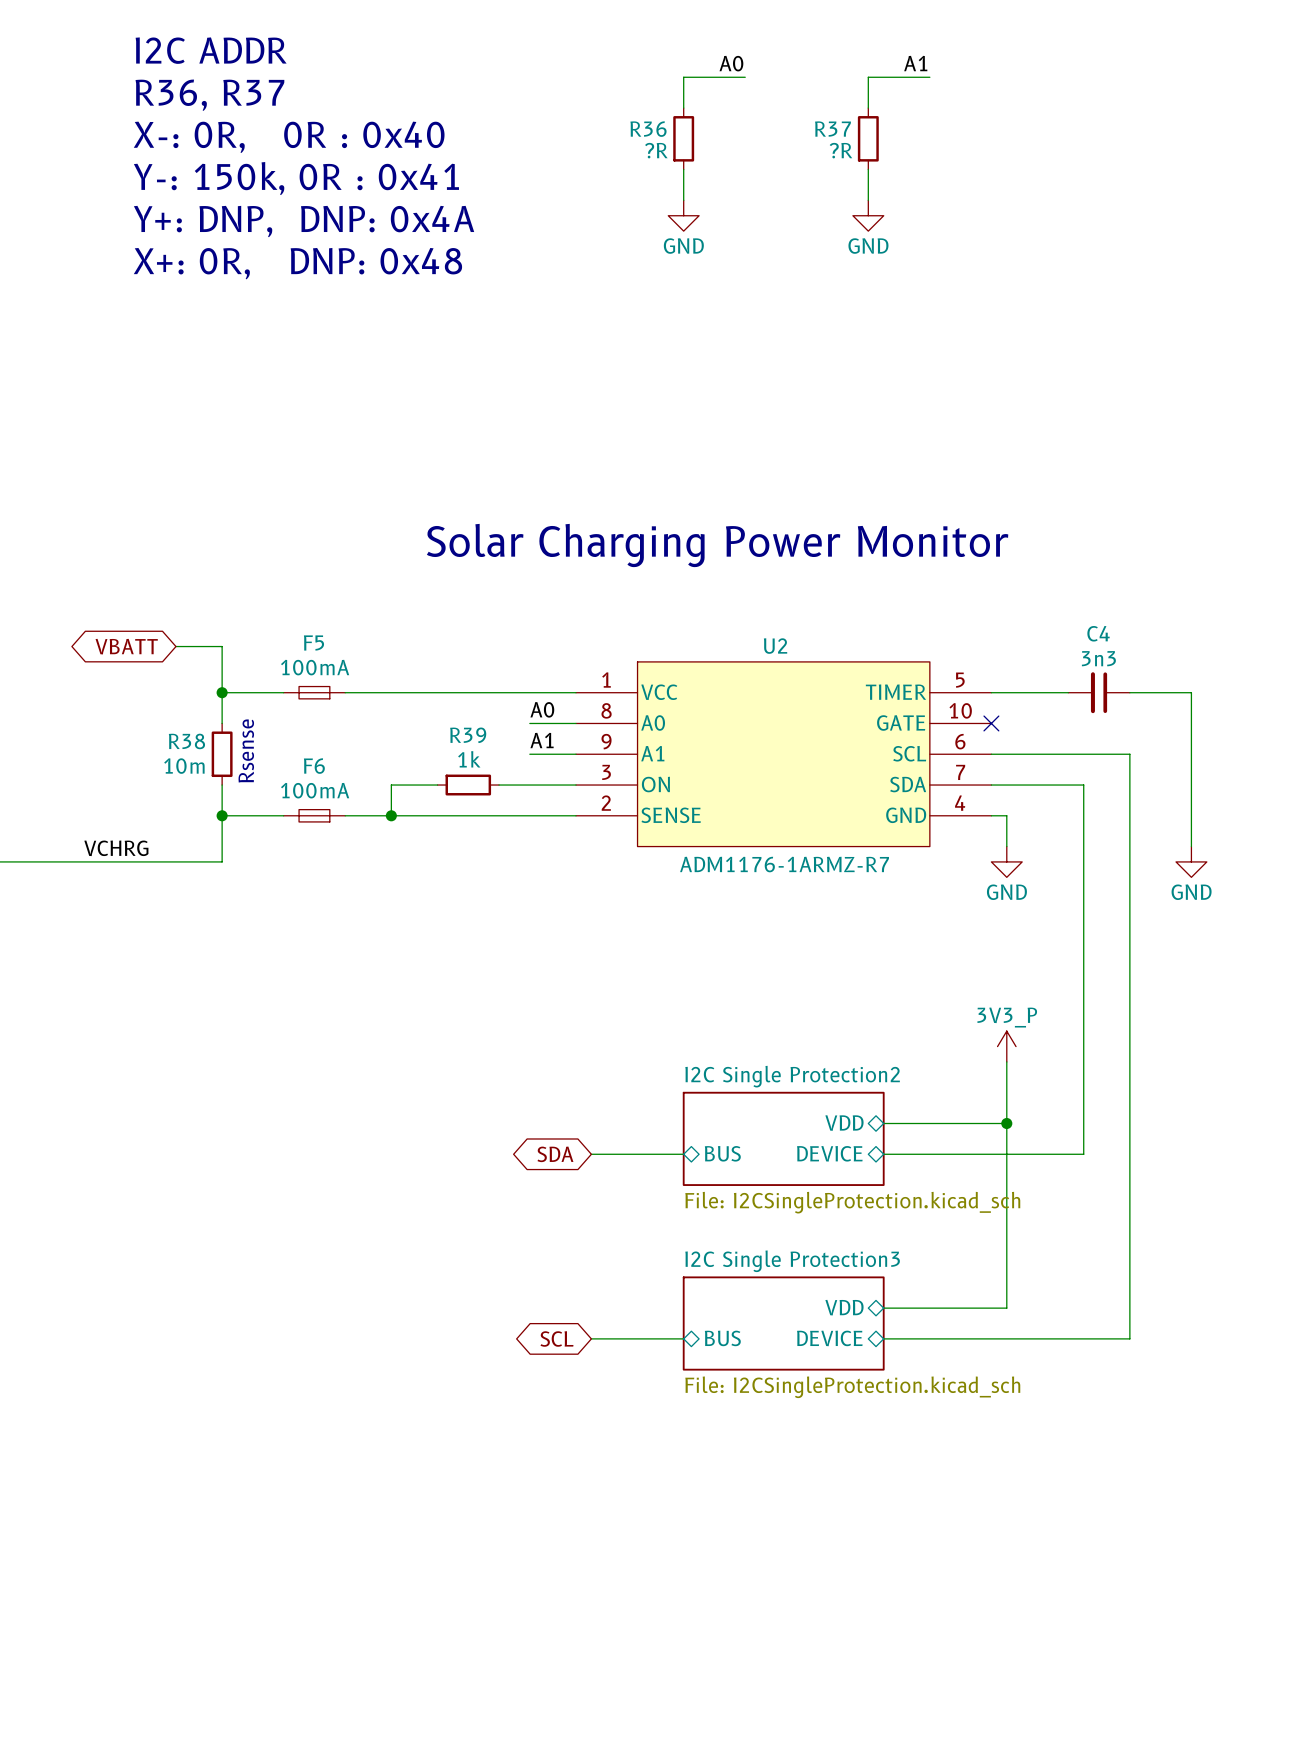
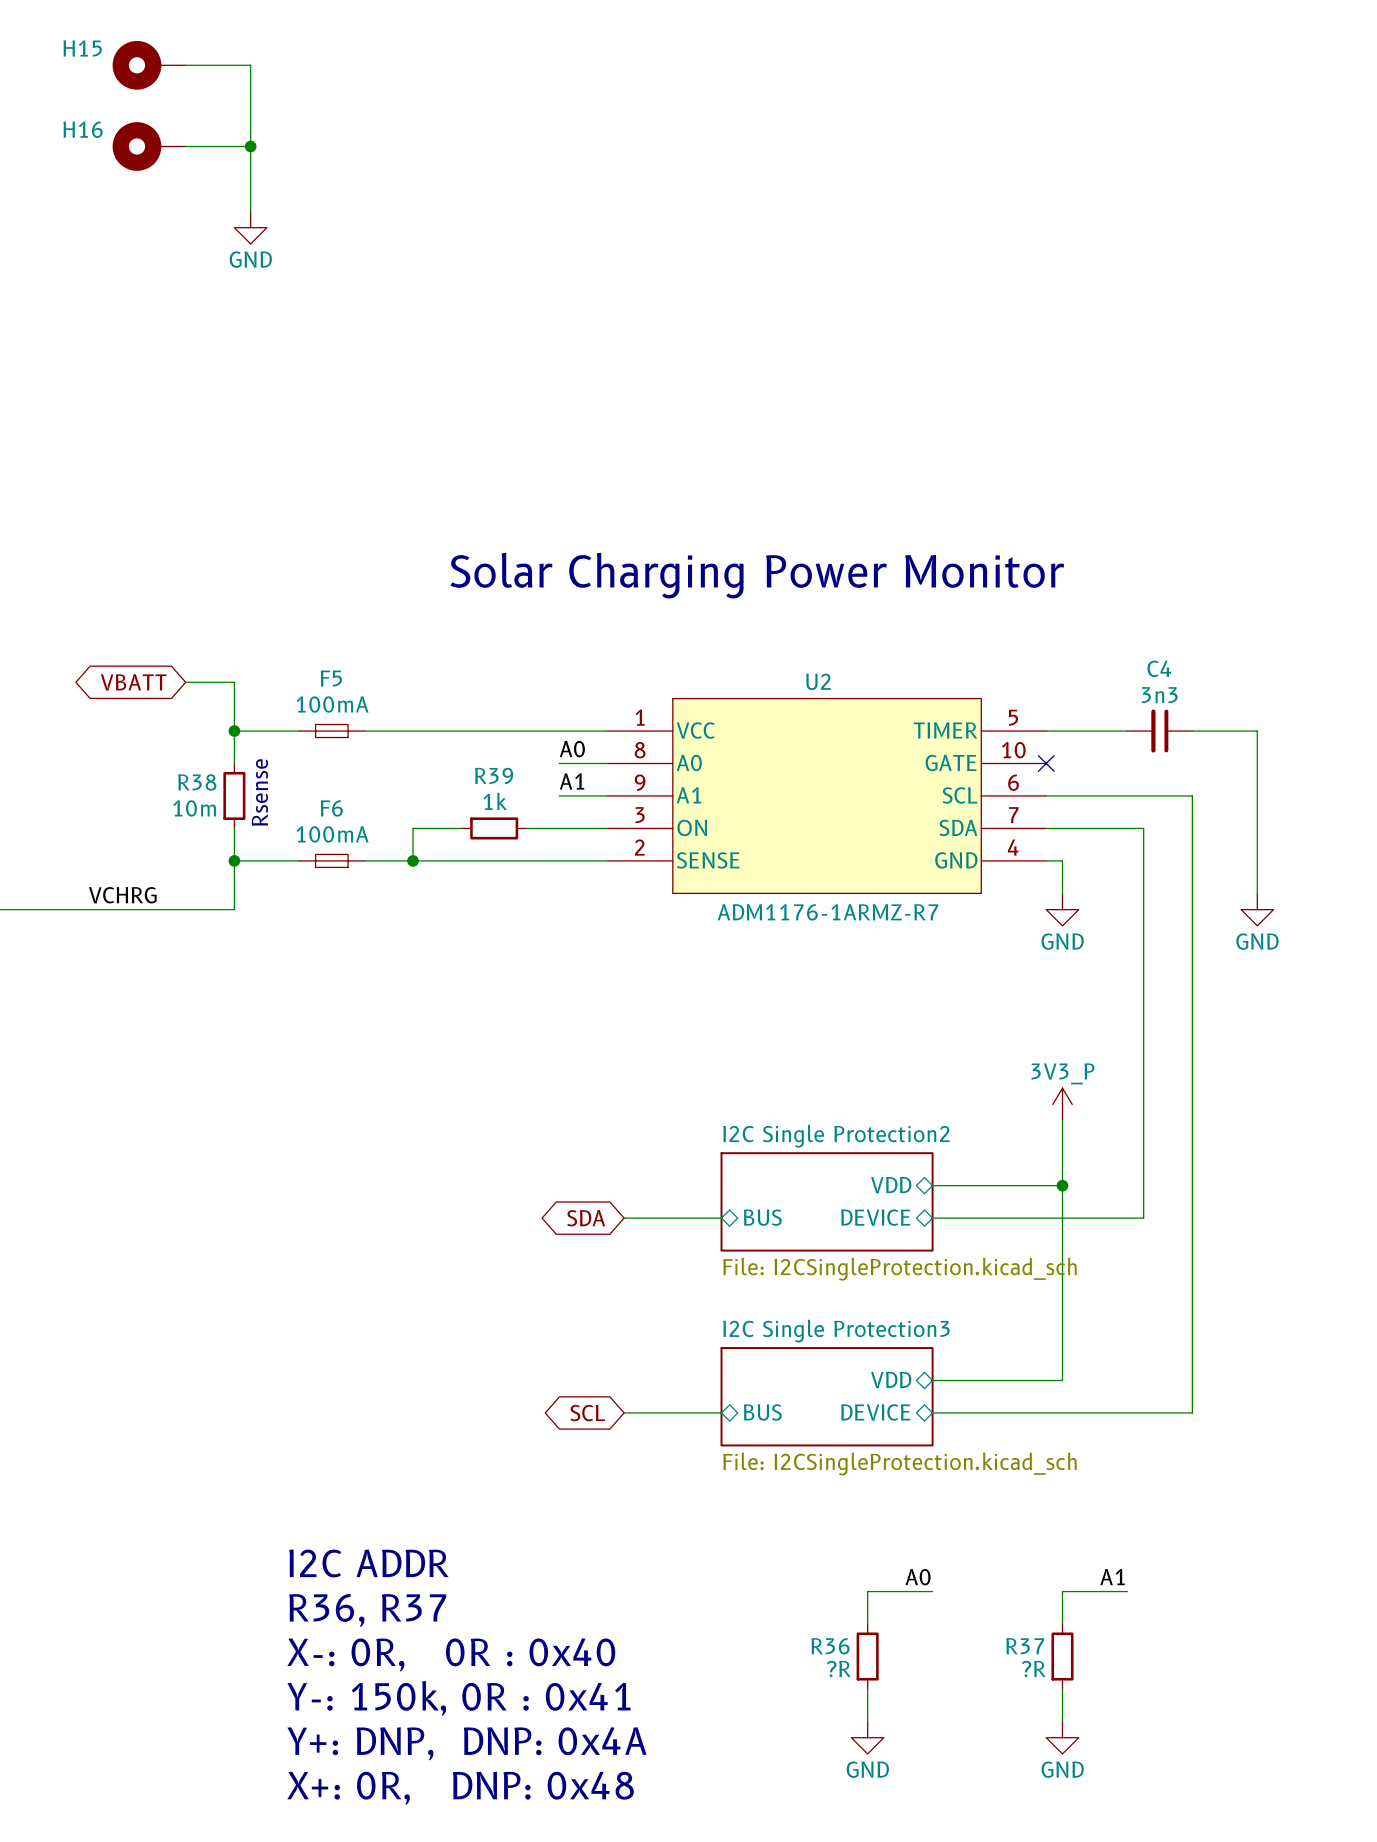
text: I2C ADDR (211, 50) -> none
H15: none -> (149, 65)
wire: none -> (185, 65) (250, 65) (250, 211)
label: A0 (731, 63) -> none
label: A1 (915, 63) -> none
wire: (745, 77) (683, 77) (683, 108) -> none
wire: (929, 77) (868, 77) (868, 108) -> none
text: R36, R37 (209, 95) -> none
text: X-: 0R, 0R : 0x40 (289, 137) -> none
H16: none -> (149, 146)
wire: none -> (185, 146) (250, 146)
junction: none -> (250, 146)
R36 position: (683, 138) -> (867, 1656)
R37 position: (868, 138) -> (1062, 1656)
wire: (683, 169) (683, 200) -> none
wire: (868, 169) (868, 200) -> none
text: Y-: 150k, 0R : 0x41 (296, 178) -> none
power symbol: none -> GND (250, 227)
power symbol: GND (683, 215) -> none
power symbol: GND (868, 215) -> none
text: Y+: DNP, DNP: 0x4A (304, 221) -> none
text: X+: 0R, DNP: 0x48 (297, 263) -> none
text: none -> I2C ADDR (368, 1563)
label: none -> A0 (918, 1577)
label: none -> A1 (1112, 1577)
wire: none -> (932, 1591) (867, 1591) (867, 1624)
wire: none -> (1127, 1591) (1062, 1591) (1062, 1624)
text: none -> R36, R37 (367, 1610)
text: none -> X-: 0R, 0R : 0x40 (451, 1654)
wire: none -> (867, 1689) (867, 1721)
wire: none -> (1062, 1689) (1062, 1721)
text: none -> Y-: 150k, 0R : 0x41 (458, 1698)
power symbol: none -> GND (867, 1737)
power symbol: none -> GND (1062, 1737)
text: none -> Y+: DNP, DNP: 0x4A (467, 1743)
text: none -> X+: 0R, DNP: 0x48 (460, 1788)

